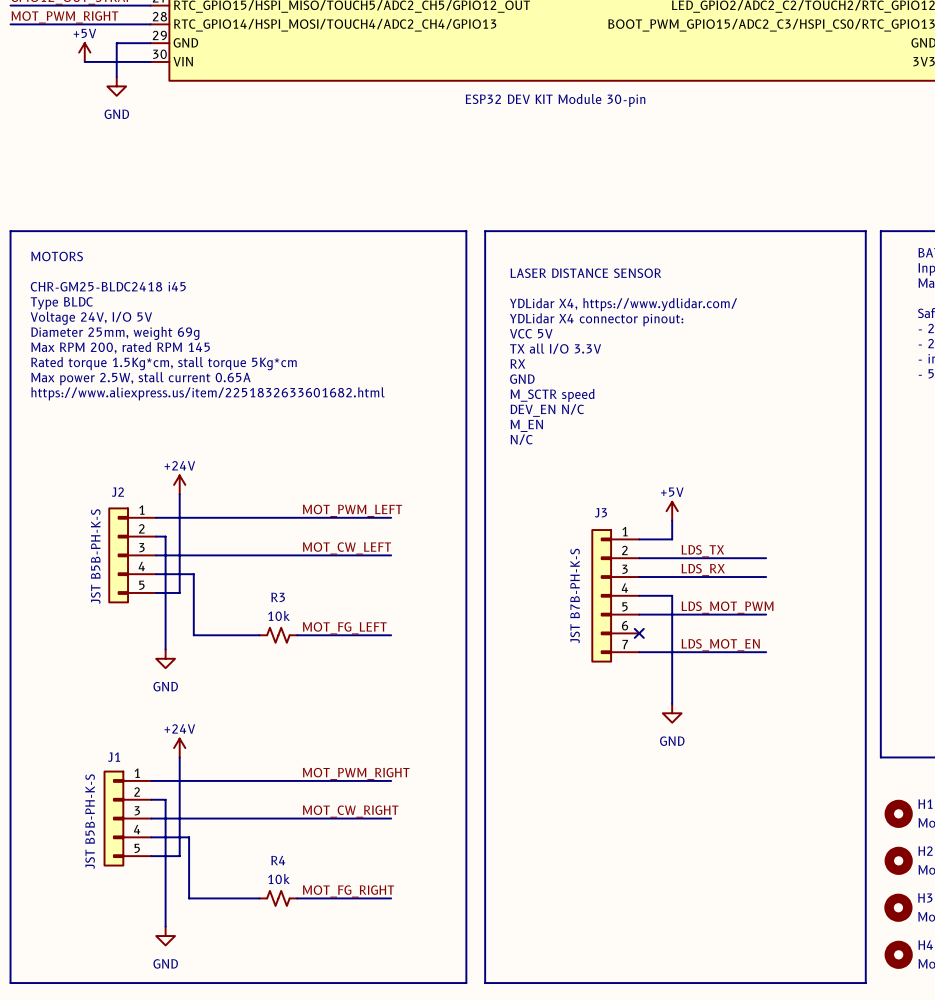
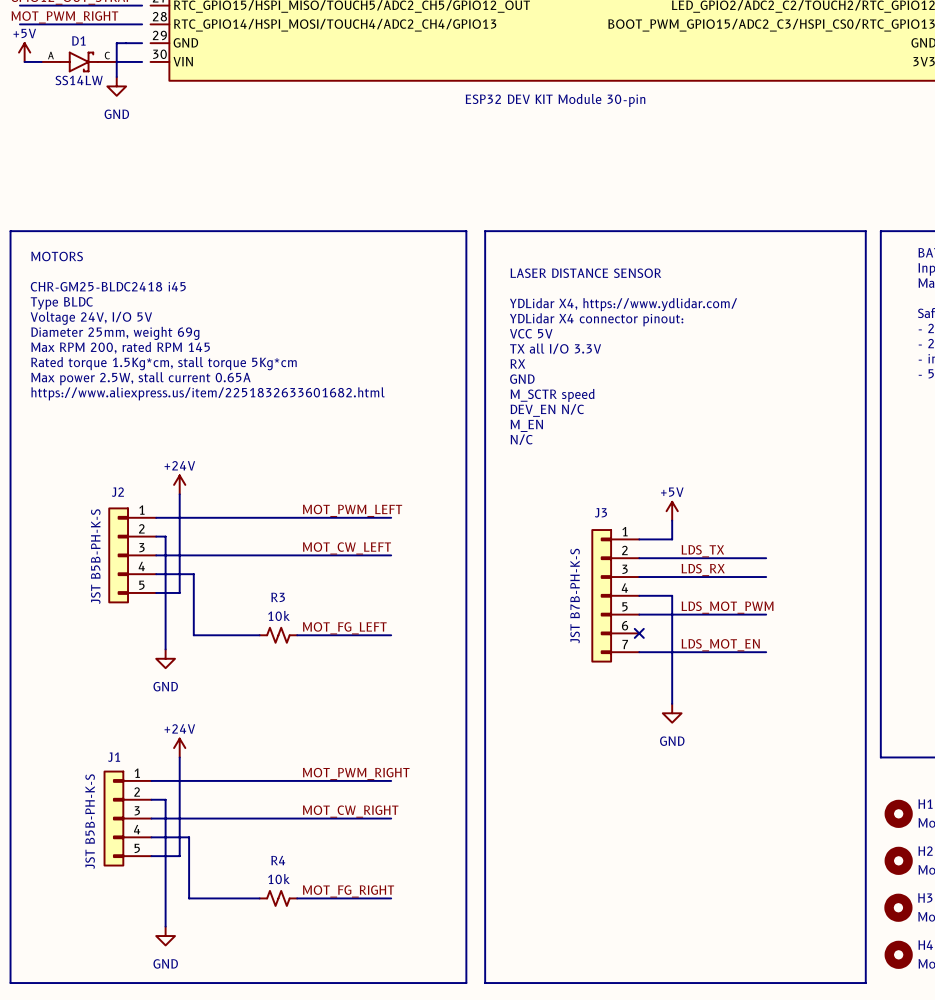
wire: (10, 5) (19, 5) -> none
wire: (142, 5) (150, 5) -> none
wire: (10, 24) (19, 24) -> none
wire: (142, 24) (150, 24) -> none
wire: (142, 43) (150, 43) -> none
power symbol position: +5V (84, 52) -> +5V (24, 52)
wire: none -> (24, 61) (41, 61)
D1: none -> SS14LW (79, 61)
wire: (142, 61) (150, 61) -> none

